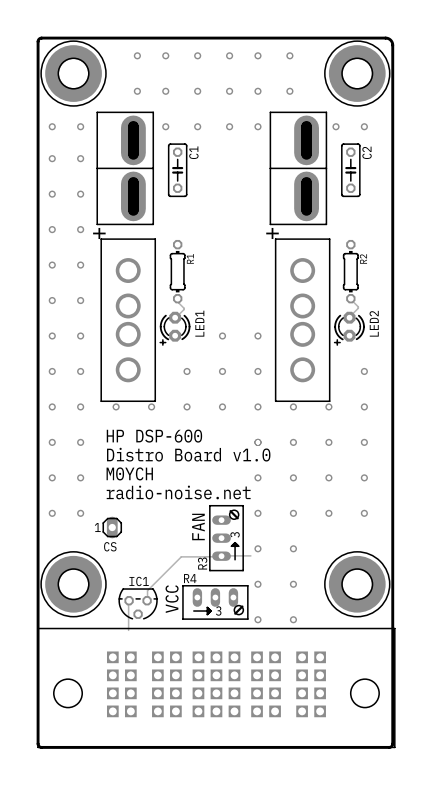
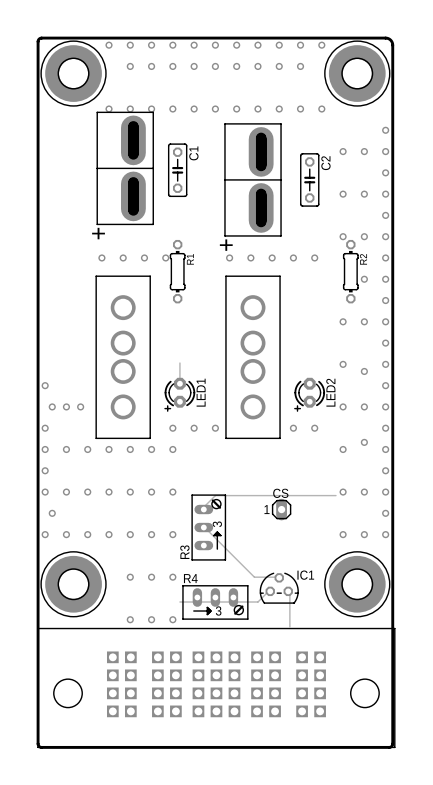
via: none -> (109, 45)
via: none -> (130, 45)
via: none -> (151, 45)
via: none -> (172, 45)
via: none -> (194, 45)
via: none -> (215, 45)
via: none -> (236, 45)
via: none -> (257, 45)
via: none -> (279, 45)
via: none -> (300, 45)
via: none -> (321, 45)
via: (137, 55) -> none
via: (165, 55) -> none
via: (197, 55) -> none
via: (229, 55) -> none
via: (257, 55) -> none
via: (289, 55) -> none
via: none -> (130, 66)
via: none -> (151, 66)
via: none -> (172, 66)
via: none -> (194, 66)
via: none -> (215, 66)
via: none -> (236, 66)
via: none -> (257, 66)
via: none -> (279, 66)
via: none -> (300, 66)
via: (137, 91) -> none
via: (165, 91) -> none
via: (197, 91) -> none
via: (229, 91) -> none
via: (257, 91) -> none
via: (289, 91) -> none
via: none -> (109, 109)
via: none -> (130, 109)
via: none -> (151, 109)
via: none -> (172, 109)
via: none -> (194, 109)
via: none -> (215, 109)
via: none -> (236, 109)
via: none -> (257, 109)
via: none -> (279, 109)
via: none -> (300, 109)
via: none -> (321, 109)
via: (52, 126) -> none
via: (80, 126) -> none
via: (165, 126) -> none
via: (197, 126) -> none
via: (229, 126) -> none
via: (257, 126) -> none
via: (336, 126) -> none
via: (364, 126) -> none
via: none -> (385, 130)
via: none -> (343, 151)
via: none -> (364, 151)
via: none -> (385, 151)
via: (52, 158) -> none
via: (80, 158) -> none
part position: (298, 168) -> (253, 179)
C2 position: (350, 170) -> (309, 179)
via: none -> (385, 172)
via: (52, 194) -> none
via: (80, 194) -> none
via: none -> (343, 194)
via: none -> (364, 194)
via: none -> (385, 194)
via: none -> (385, 215)
via: (52, 229) -> none
via: (80, 229) -> none
via: none -> (343, 236)
via: none -> (364, 236)
via: none -> (385, 236)
via: none -> (101, 257)
via: none -> (123, 257)
via: none -> (144, 257)
via: none -> (165, 257)
via: none -> (229, 257)
via: none -> (250, 257)
via: none -> (272, 257)
via: none -> (293, 257)
via: none -> (314, 257)
via: none -> (385, 257)
via: (52, 265) -> none
via: (80, 265) -> none
via: none -> (364, 279)
via: none -> (385, 279)
track: (177, 298) (184, 309) (175, 317) -> none
track: (350, 298) (358, 308) (349, 317) -> none
via: (52, 300) -> none
via: (80, 300) -> none
via: none -> (385, 300)
part position: (128, 320) -> (123, 357)
part position: (302, 320) -> (253, 357)
via: none -> (343, 321)
via: none -> (364, 321)
via: none -> (385, 321)
LED1 name position: LED1 (199, 323) -> LED1 (201, 392)
LED2 name position: LED2 (374, 323) -> LED2 (330, 392)
LED1 position: (175, 328) -> (179, 394)
LED2 position: (349, 328) -> (309, 394)
via: (52, 336) -> none
via: (80, 336) -> none
via: (222, 336) -> none
via: (257, 336) -> none
via: none -> (385, 343)
track: none -> (179, 363) (179, 383)
via: none -> (343, 364)
via: none -> (385, 364)
via position: (52, 371) -> (45, 385)
via: (80, 371) -> none
via: (187, 371) -> none
via: (222, 371) -> none
via: (257, 371) -> none
via: none -> (385, 385)
via: none -> (66, 406)
via: (116, 406) -> none
via: (151, 406) -> none
via: (187, 406) -> none
via: (222, 406) -> none
via: (257, 406) -> none
via: (293, 406) -> none
via: (328, 406) -> none
via: none -> (343, 406)
via: none -> (385, 406)
via: none -> (45, 428)
via: none -> (172, 428)
via: none -> (194, 428)
via: none -> (215, 428)
via: none -> (293, 428)
via: none -> (314, 428)
via: none -> (385, 428)
text: HP DSP-600 (154, 436) -> none
via: (52, 442) -> none
via: (80, 442) -> none
via: (257, 442) -> none
via: (293, 442) -> none
via: (328, 442) -> none
via: none -> (45, 449)
via: none -> (66, 449)
via: none -> (87, 449)
via: none -> (109, 449)
via: none -> (130, 449)
via: none -> (151, 449)
via: none -> (172, 449)
via: none -> (343, 449)
via: none -> (385, 449)
text: Distro Board v1.0 (188, 454) -> none
via: none -> (45, 470)
via: none -> (385, 470)
text: M0YCH (129, 473) -> none
via: (52, 477) -> none
via: (80, 477) -> none
via: (257, 477) -> none
via: (293, 477) -> none
via: (328, 477) -> none
via: (364, 477) -> none
via: none -> (45, 492)
via: none -> (66, 492)
via: none -> (87, 492)
via: none -> (109, 492)
via: none -> (130, 492)
via: none -> (151, 492)
via: none -> (172, 492)
text: radio-noise.net (178, 492) -> none
via: none -> (343, 492)
via: none -> (364, 492)
via: none -> (385, 492)
track: none -> (336, 495) (215, 495) (203, 509)
via: (80, 513) -> none
via: (257, 513) -> none
via: (293, 513) -> none
via: (328, 513) -> none
via: (364, 513) -> none
via: none -> (385, 513)
text: FAN (198, 526) -> none
CS position: (112, 527) -> (281, 509)
track: none -> (203, 527) (254, 577) (279, 577)
via: none -> (45, 534)
via: none -> (66, 534)
via: none -> (87, 534)
via: none -> (109, 534)
via: none -> (130, 534)
via: none -> (151, 534)
via: none -> (172, 534)
via: none -> (343, 534)
via: none -> (364, 534)
via: none -> (385, 534)
R3 position: (226, 538) -> (208, 527)
CS name position: CS (110, 546) -> CS (280, 493)
via: (257, 548) -> none
via: (293, 548) -> none
track: (250, 555) (204, 556) -> none
track: (205, 556) (181, 556) (147, 590) (147, 600) -> none
via: none -> (130, 577)
via: none -> (151, 577)
via: none -> (172, 577)
IC1 name position: IC1 (139, 581) -> IC1 (305, 575)
via: (257, 584) -> none
via: (293, 584) -> none
track: none -> (270, 591) (257, 602) (179, 602)
track: none -> (288, 591) (289, 591) (289, 626)
text: VCC (172, 599) -> none
track: (129, 600) (128, 630) -> none
IC1 rotation: 0° (138, 603) -> 180° (279, 588)
IC1 position: (138, 603) -> (279, 588)
via: none -> (130, 619)
via: none -> (151, 619)
via: none -> (172, 619)
via: (257, 619) -> none
via: (293, 619) -> none

